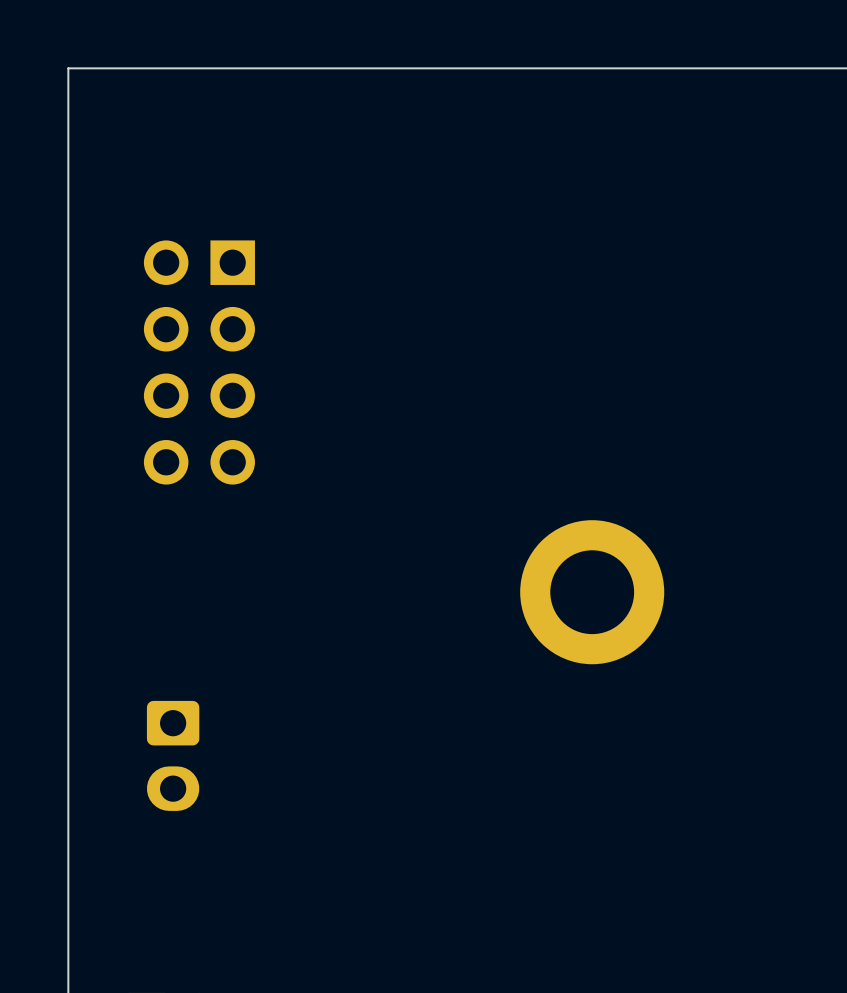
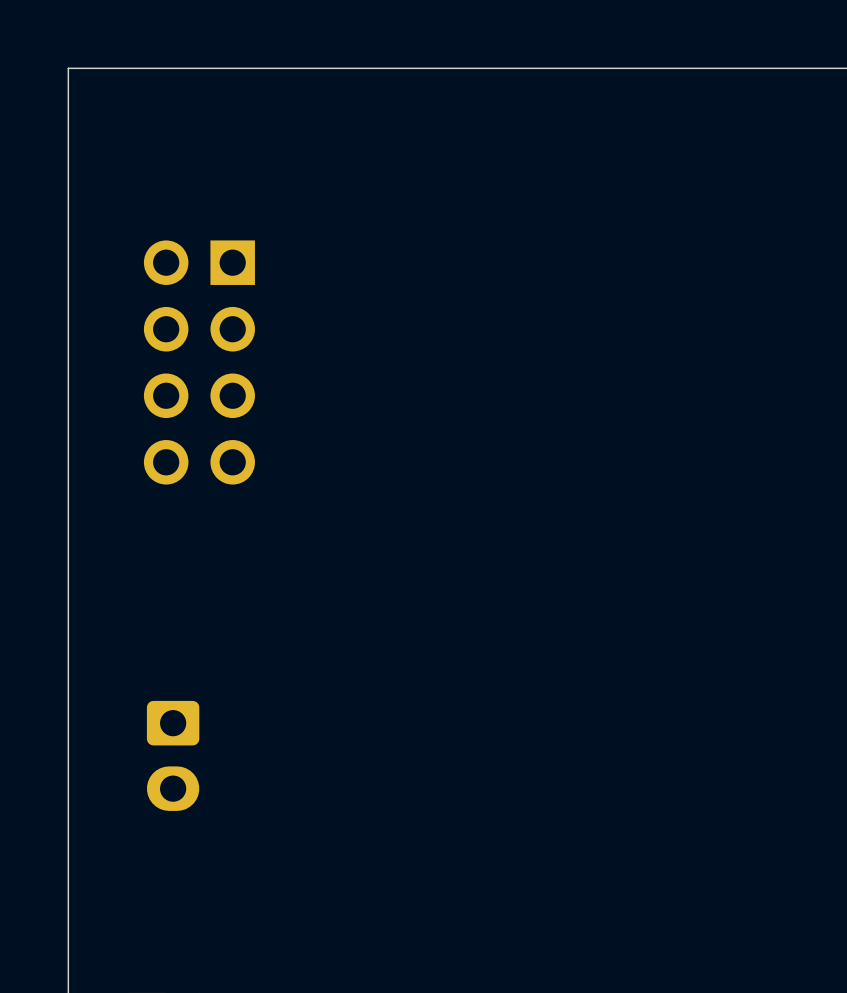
part: (592, 592) -> none

